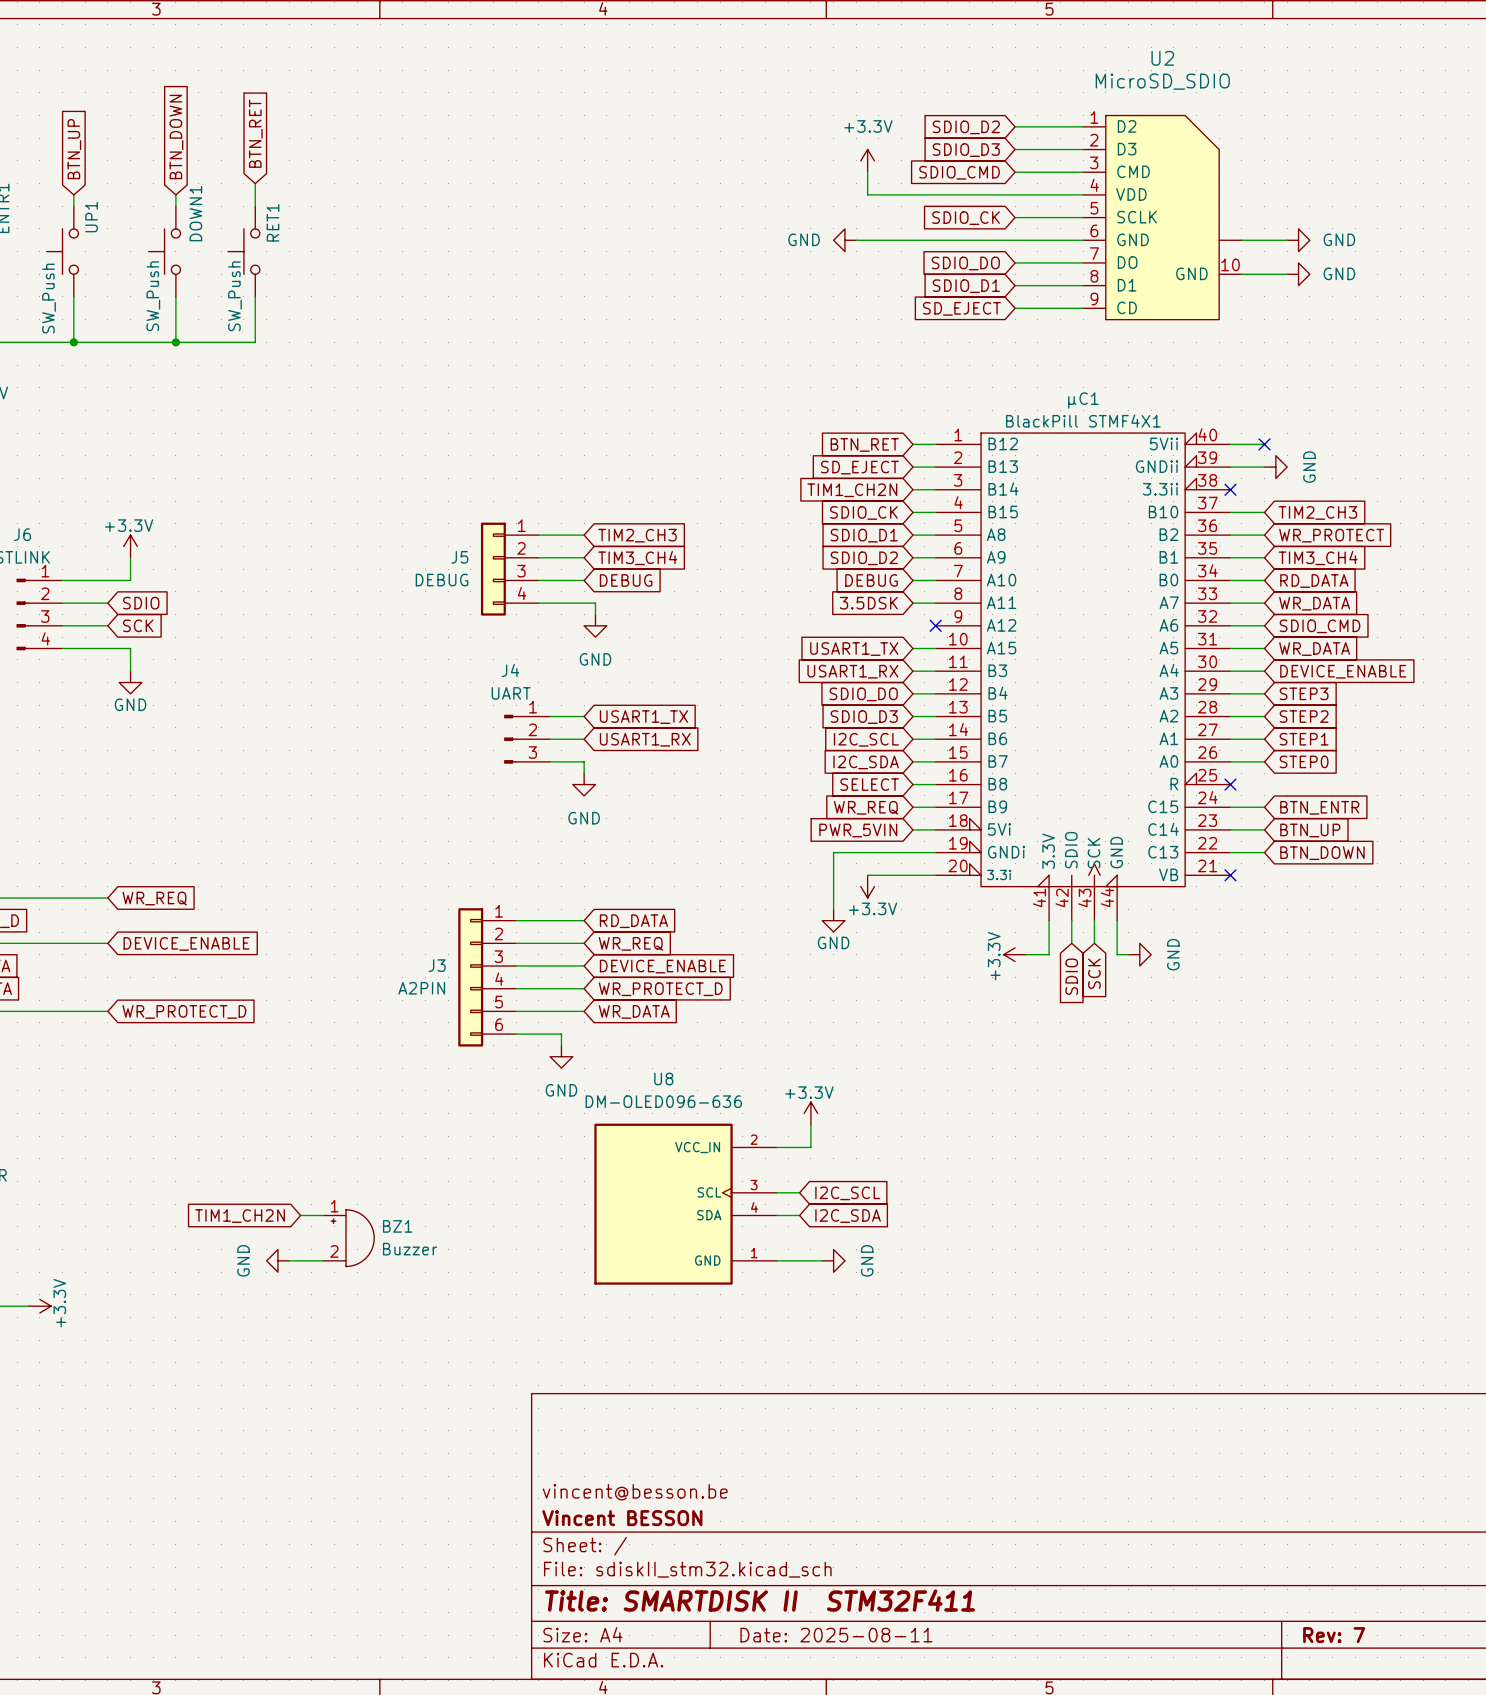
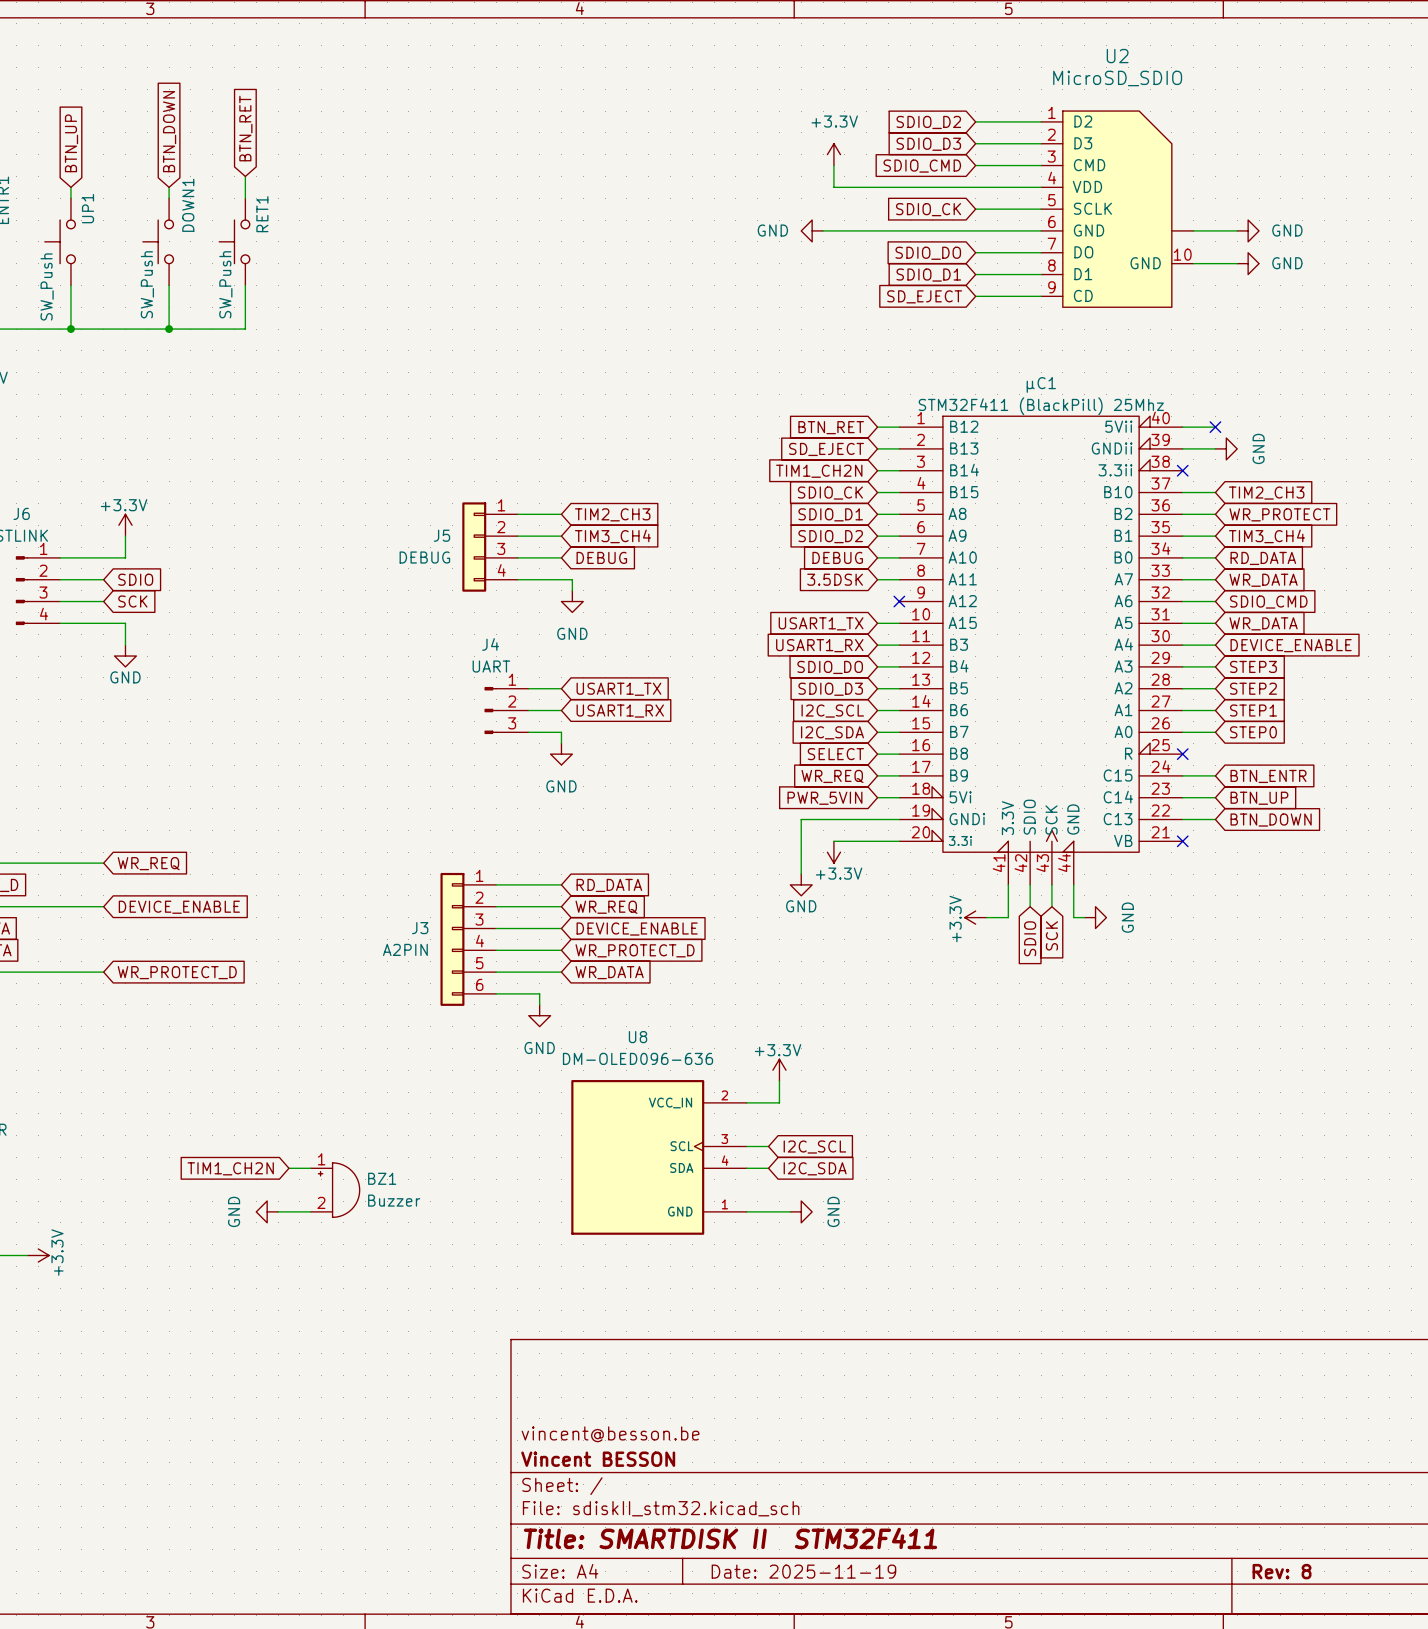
μC1 value: BlackPill STMF4X1 (1083, 421) -> STM32F411 (BlackPill) 25Mhz (1041, 406)
title block: Date: 2025-08-11 (836, 1635) -> Date: 2025-11-19 (803, 1571)
title block: Rev: 7 (1334, 1635) -> Rev: 8 (1282, 1571)

